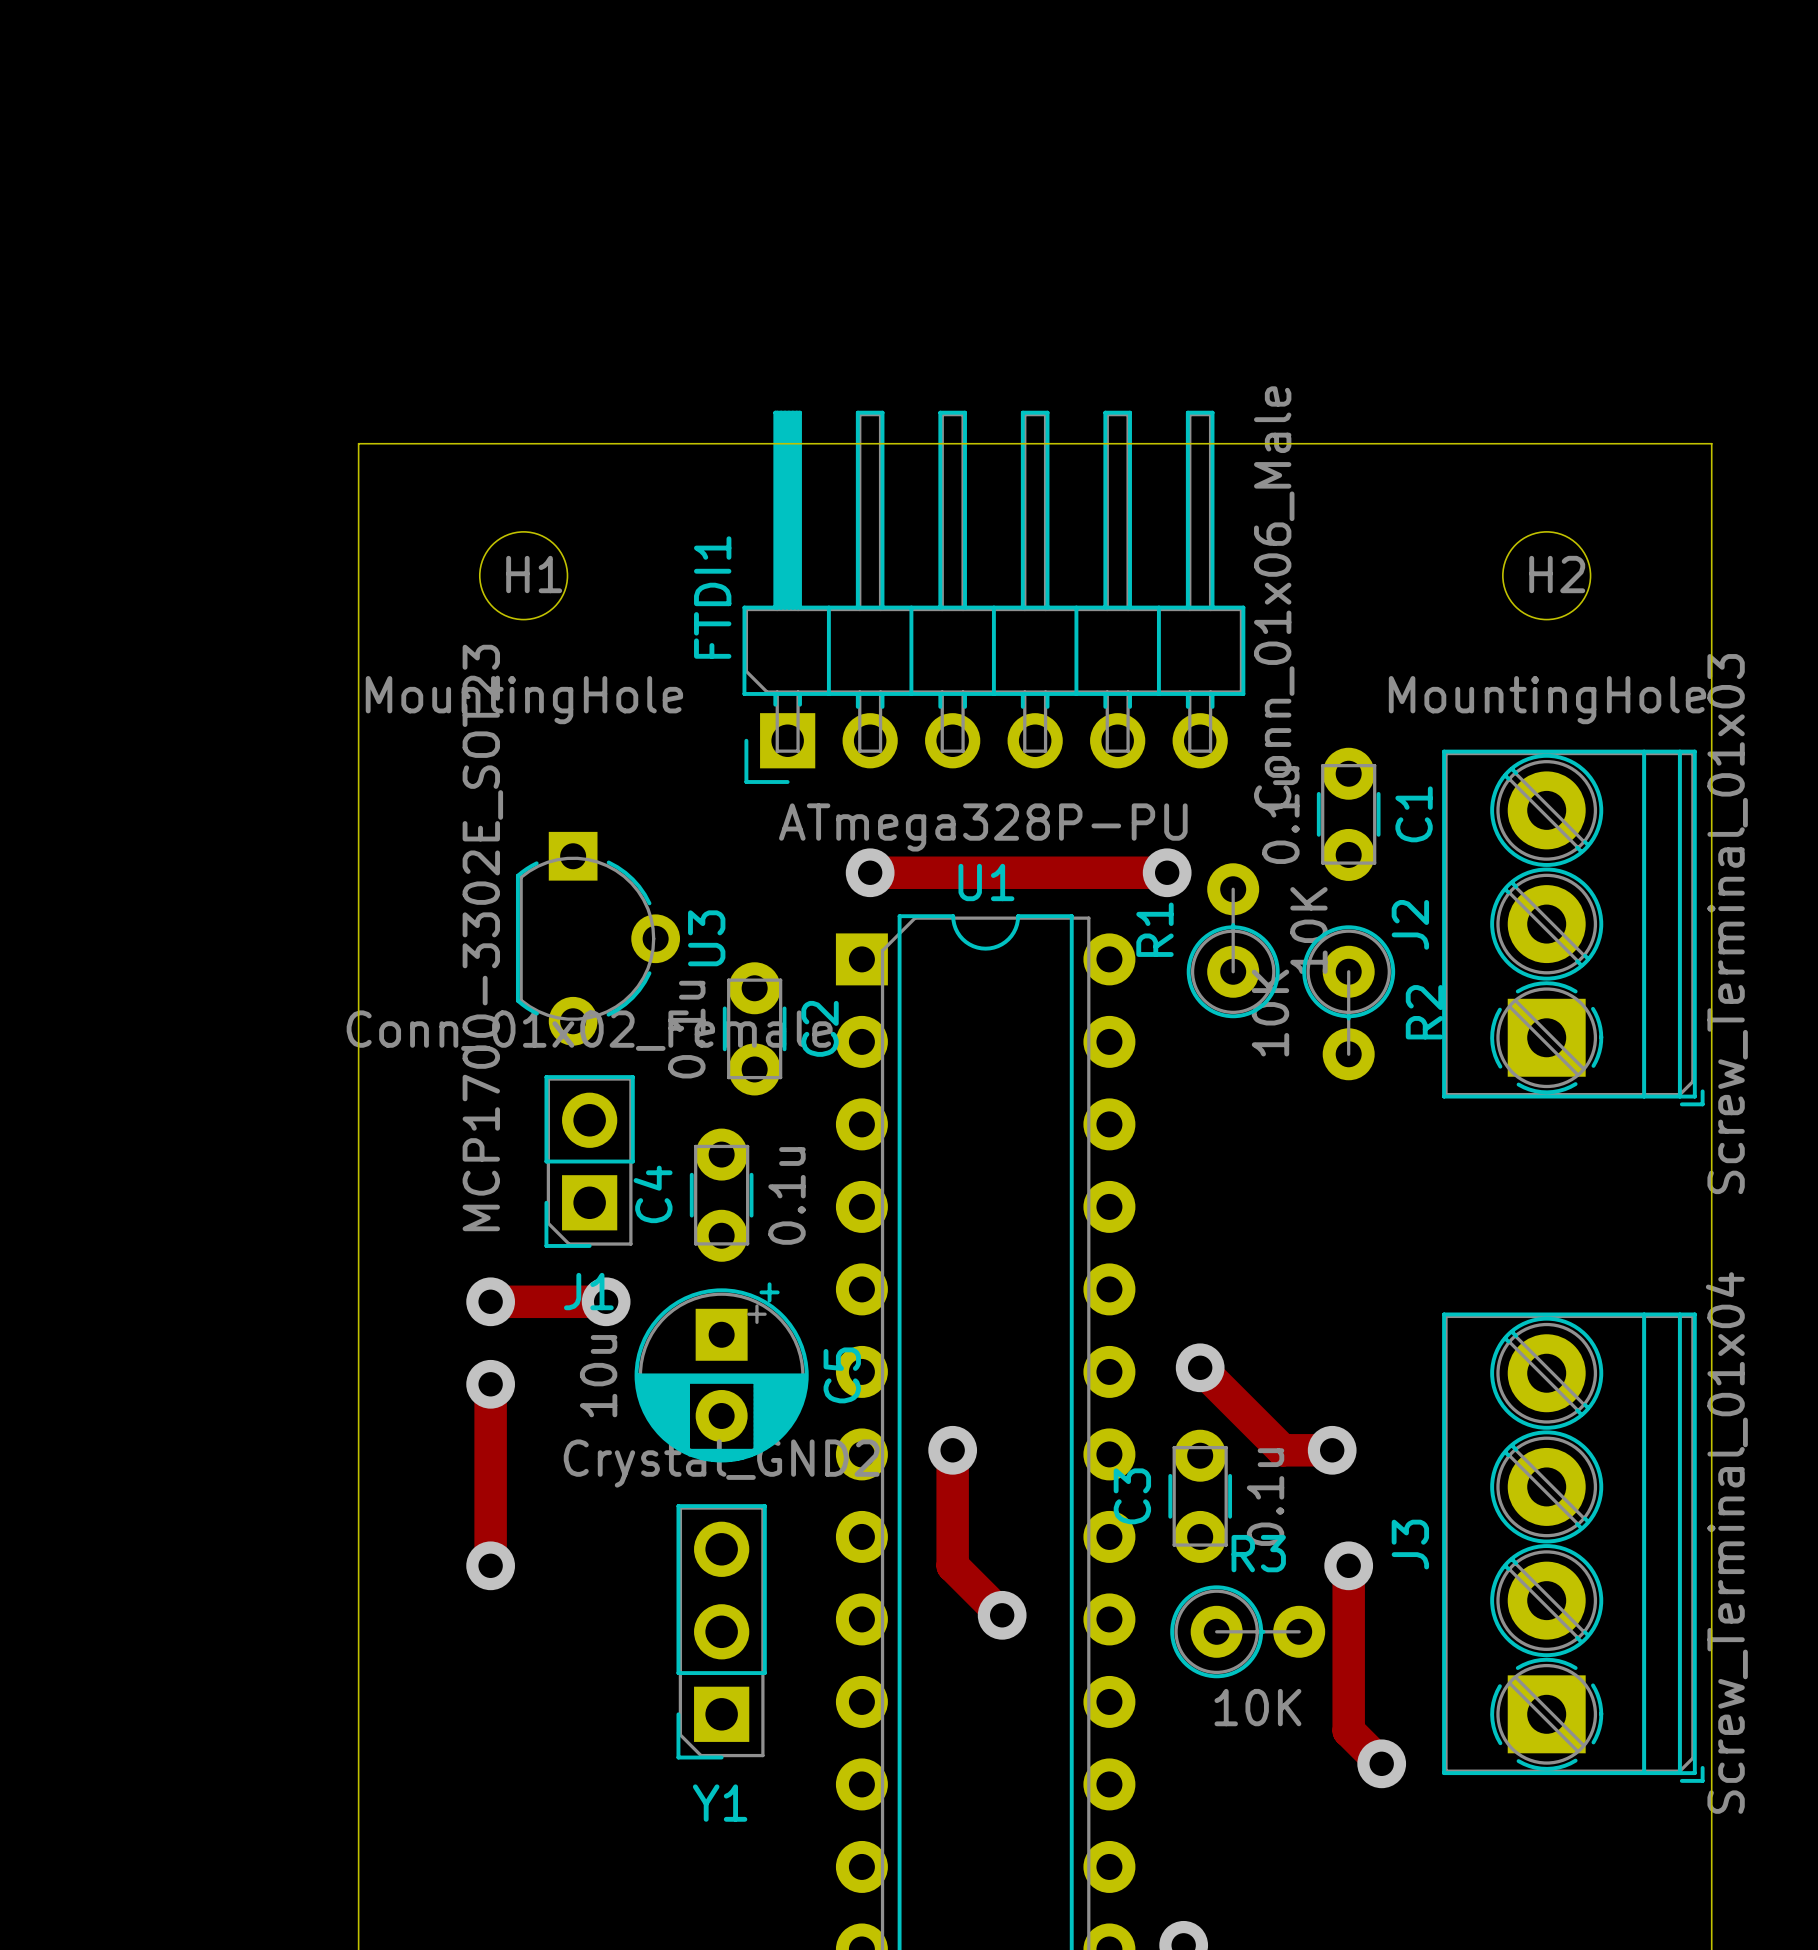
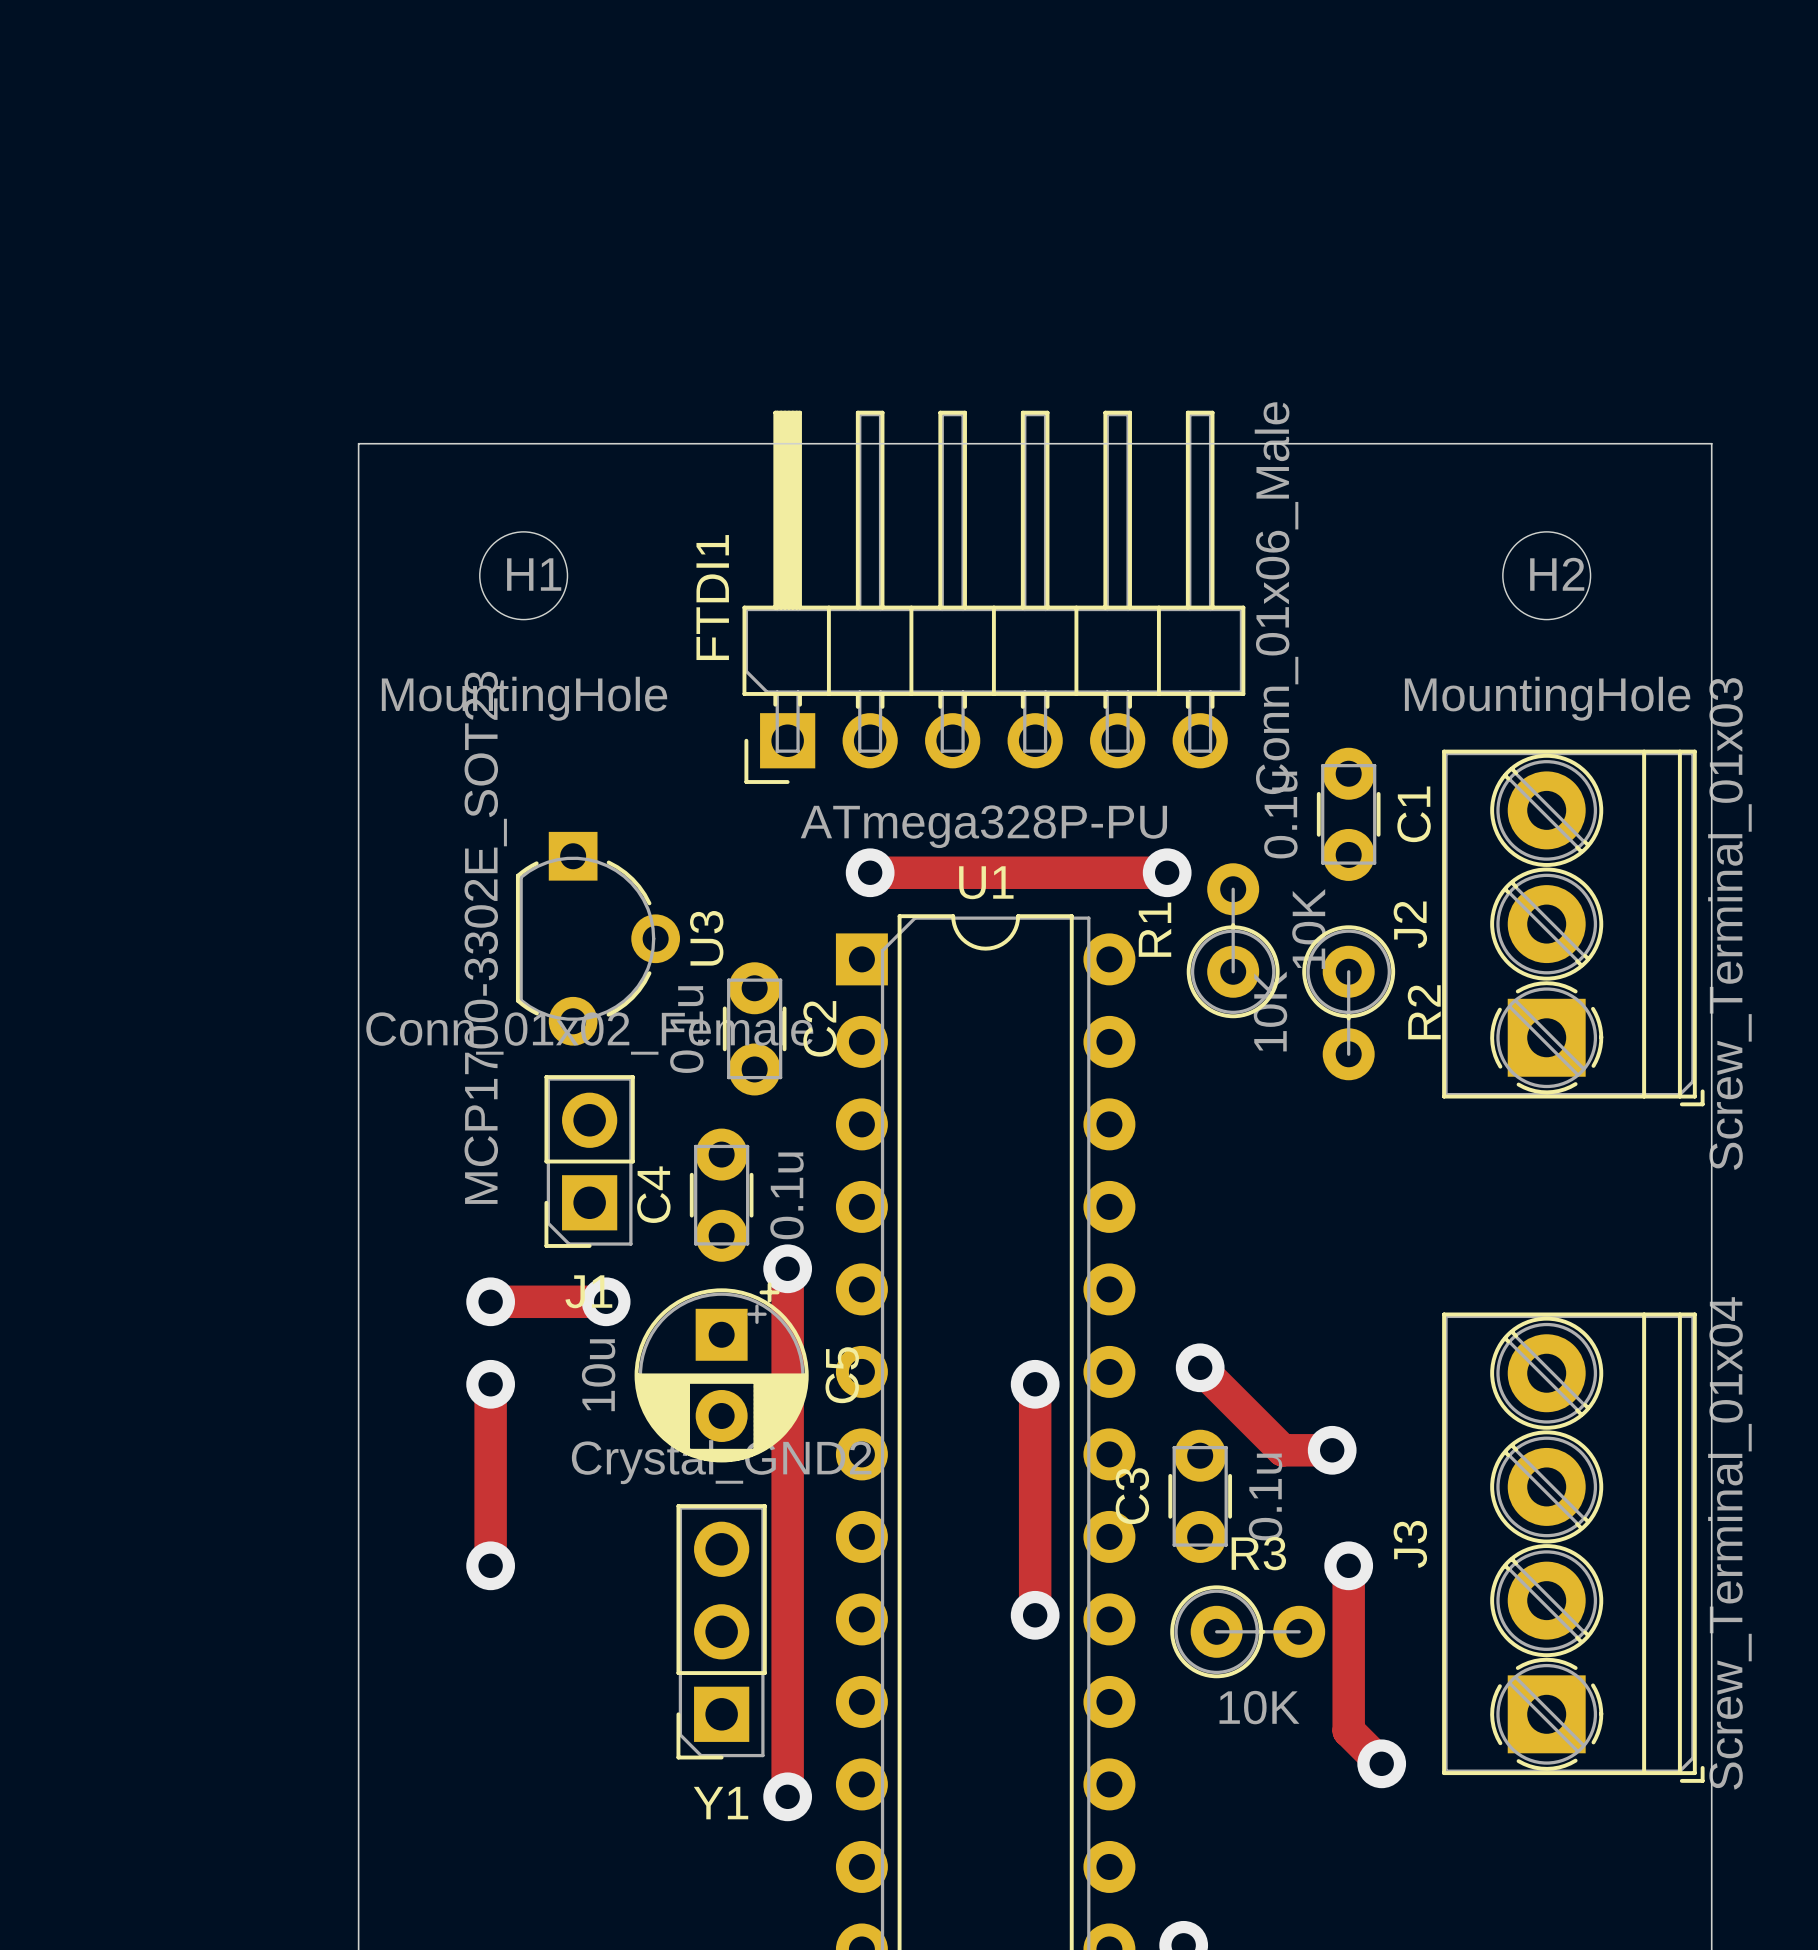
track: none -> (787, 1268) (787, 1796)
via: none -> (787, 1268)
track: none -> (1035, 1384) (1035, 1615)
via: none -> (1035, 1384)
track: (952, 1450) (952, 1565) (1002, 1615) -> none
via: (952, 1450) -> none
via position: (1002, 1615) -> (1035, 1615)
via: none -> (787, 1796)

